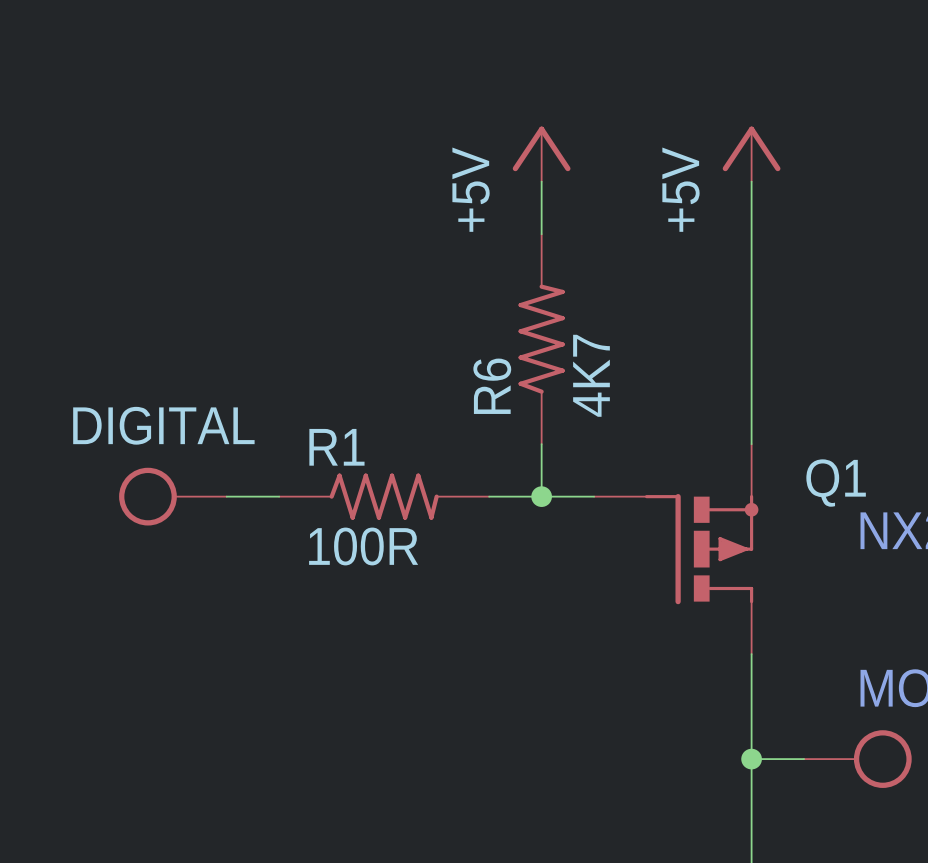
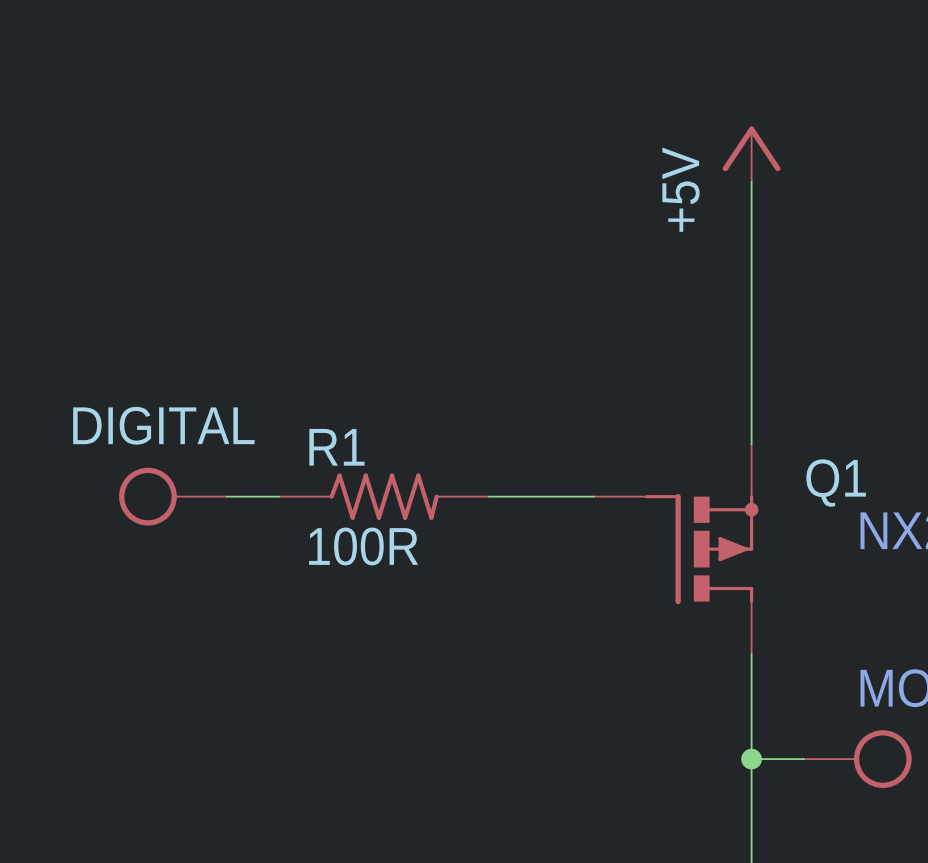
power symbol: +5V (541, 154) -> none
wire: (541, 181) (541, 234) -> none
R6: 4K7 (541, 339) -> none
wire: (541, 444) (541, 496) -> none
junction: (541, 496) -> none

